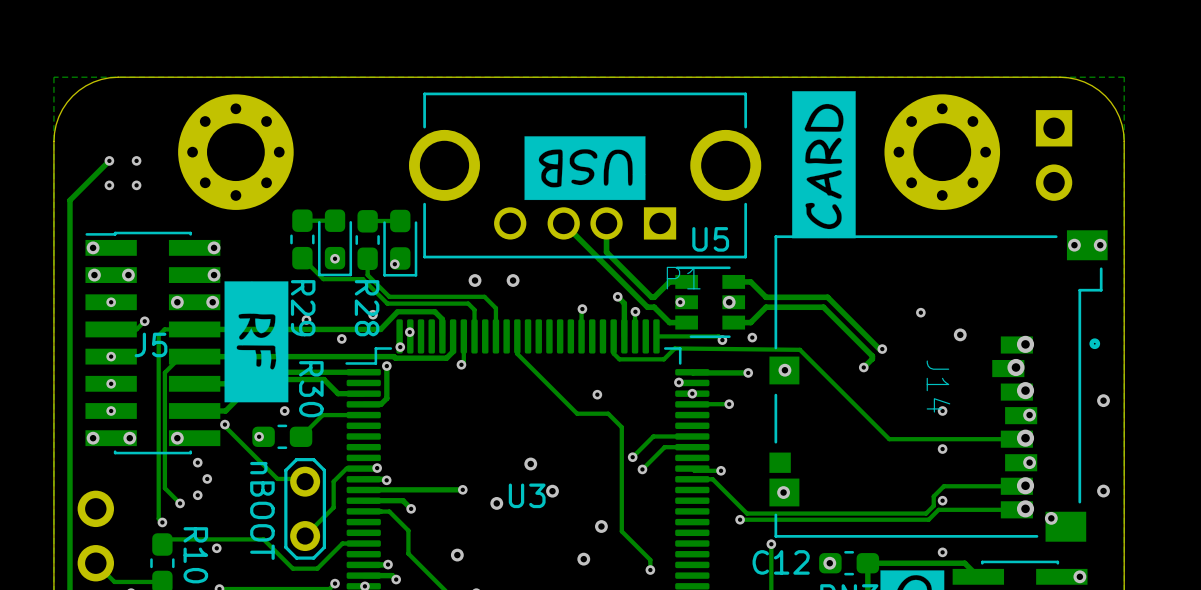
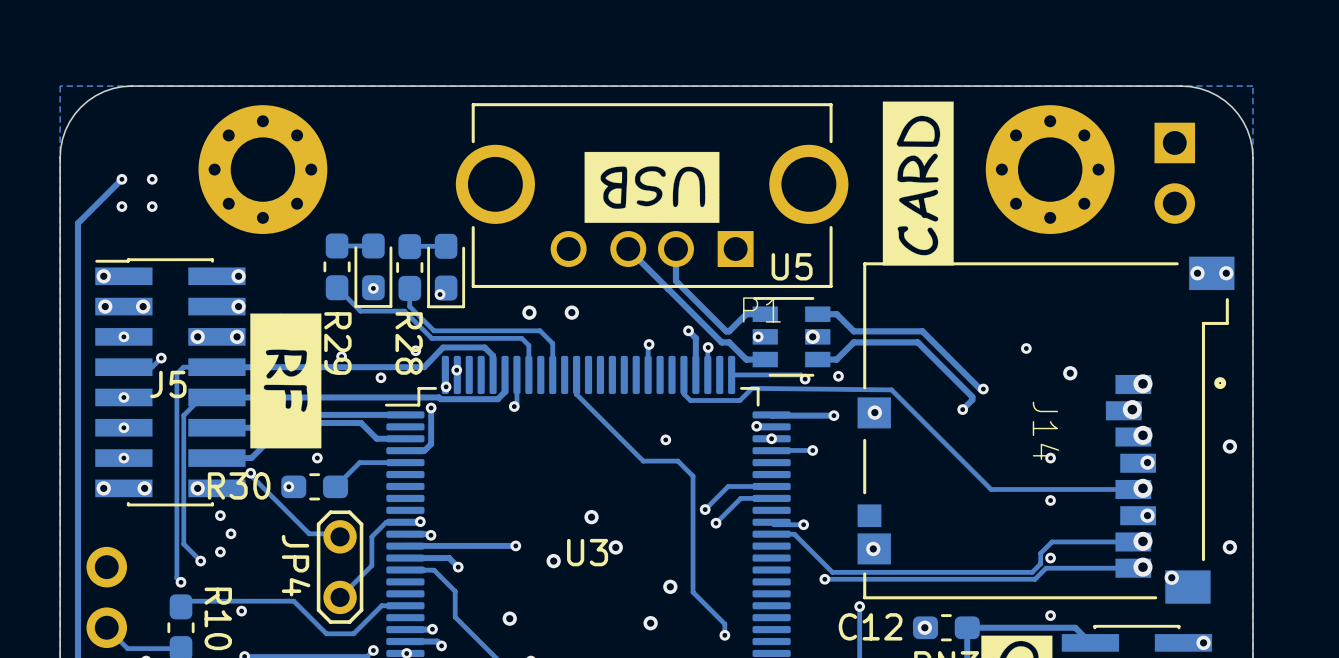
R30 name rotation: 0° (311, 389) -> 90° counterclockwise (239, 485)
R30 name position: R30 (311, 389) -> R30 (239, 485)
JP4 name: none -> JP4 (296, 565)
JP4 value: nBOOT (262, 510) -> none

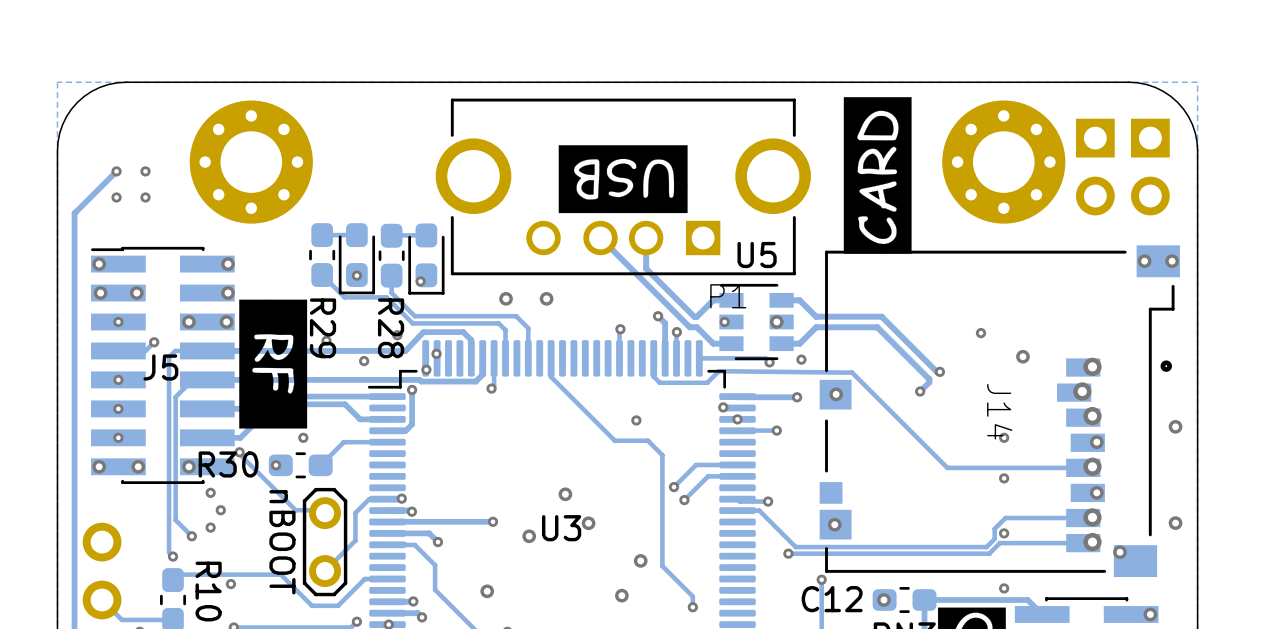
part: (1174, 173) -> none
part: none -> (1095, 167)
part: none -> (1150, 167)
JP4 name: JP4 (296, 565) -> nBOOT (282, 542)

